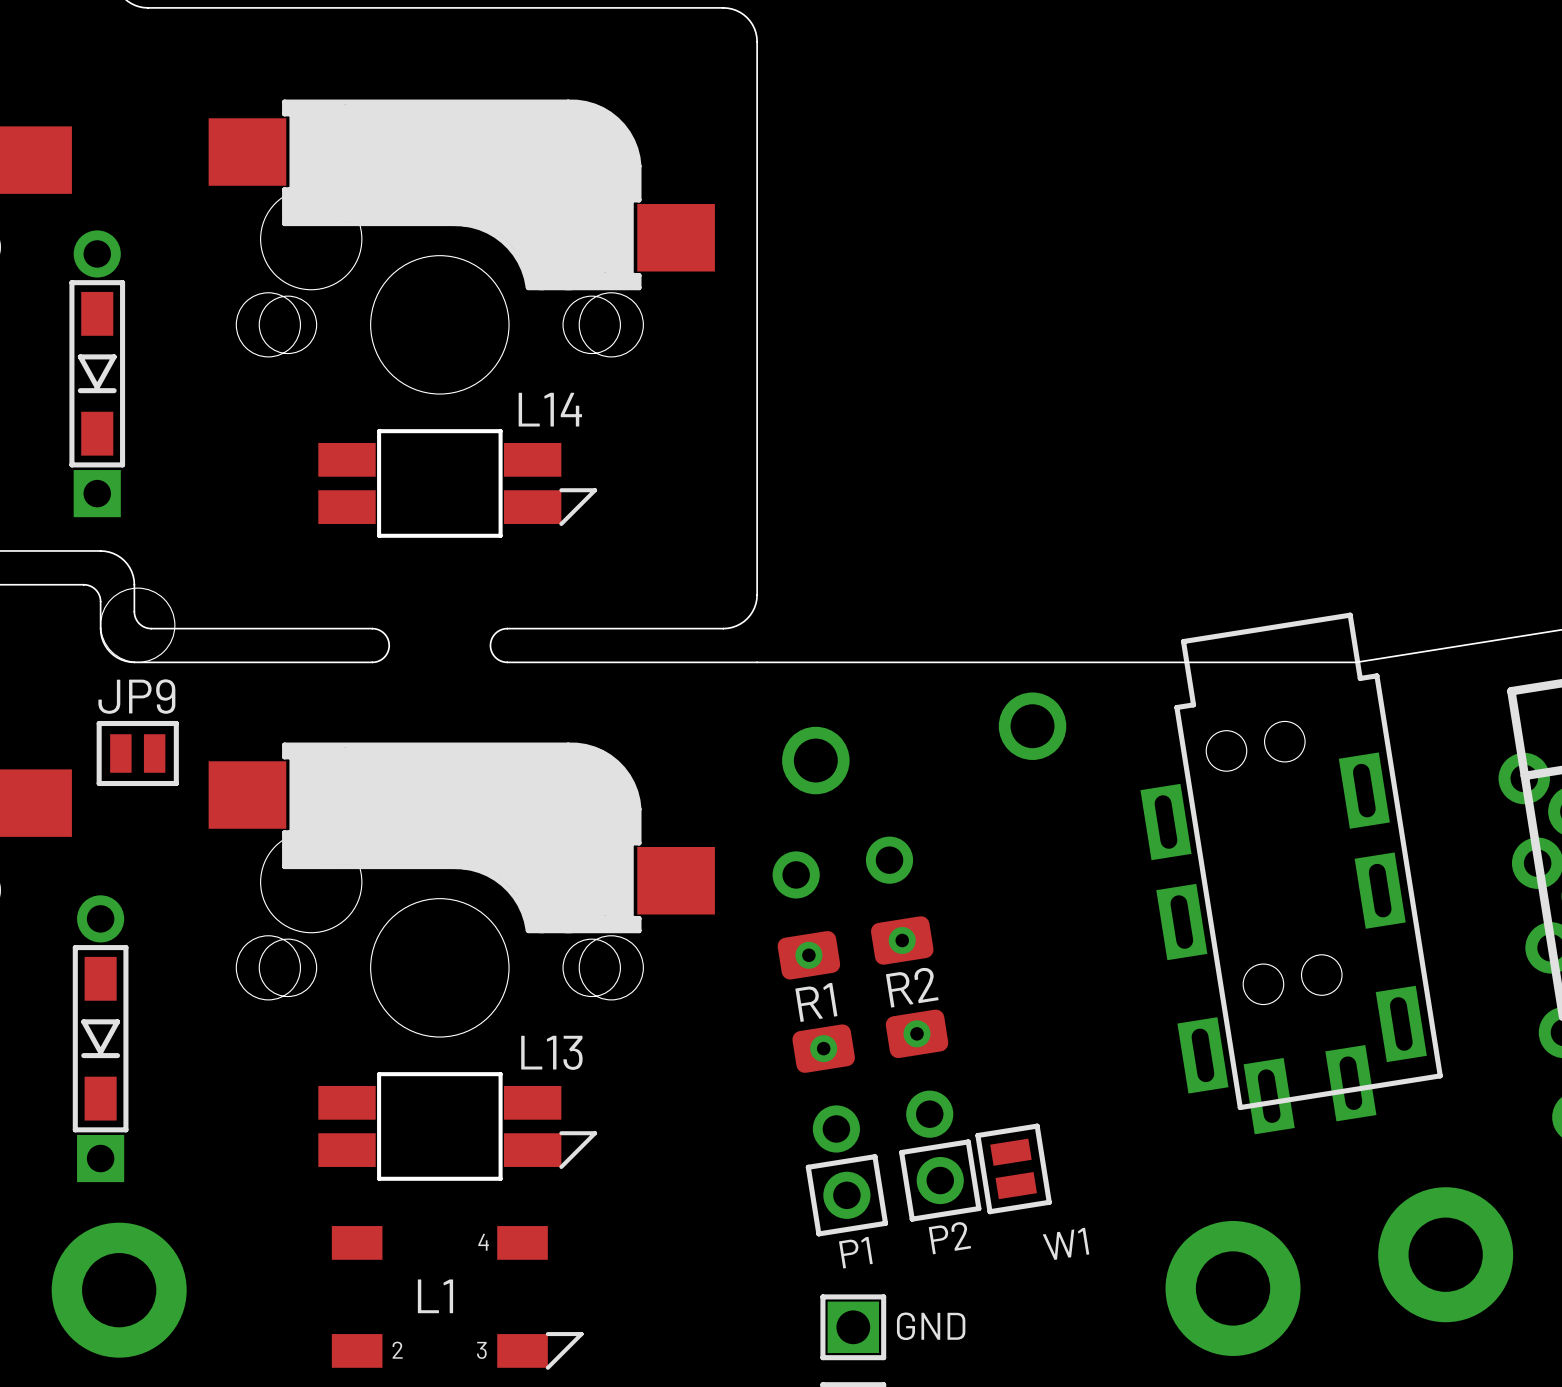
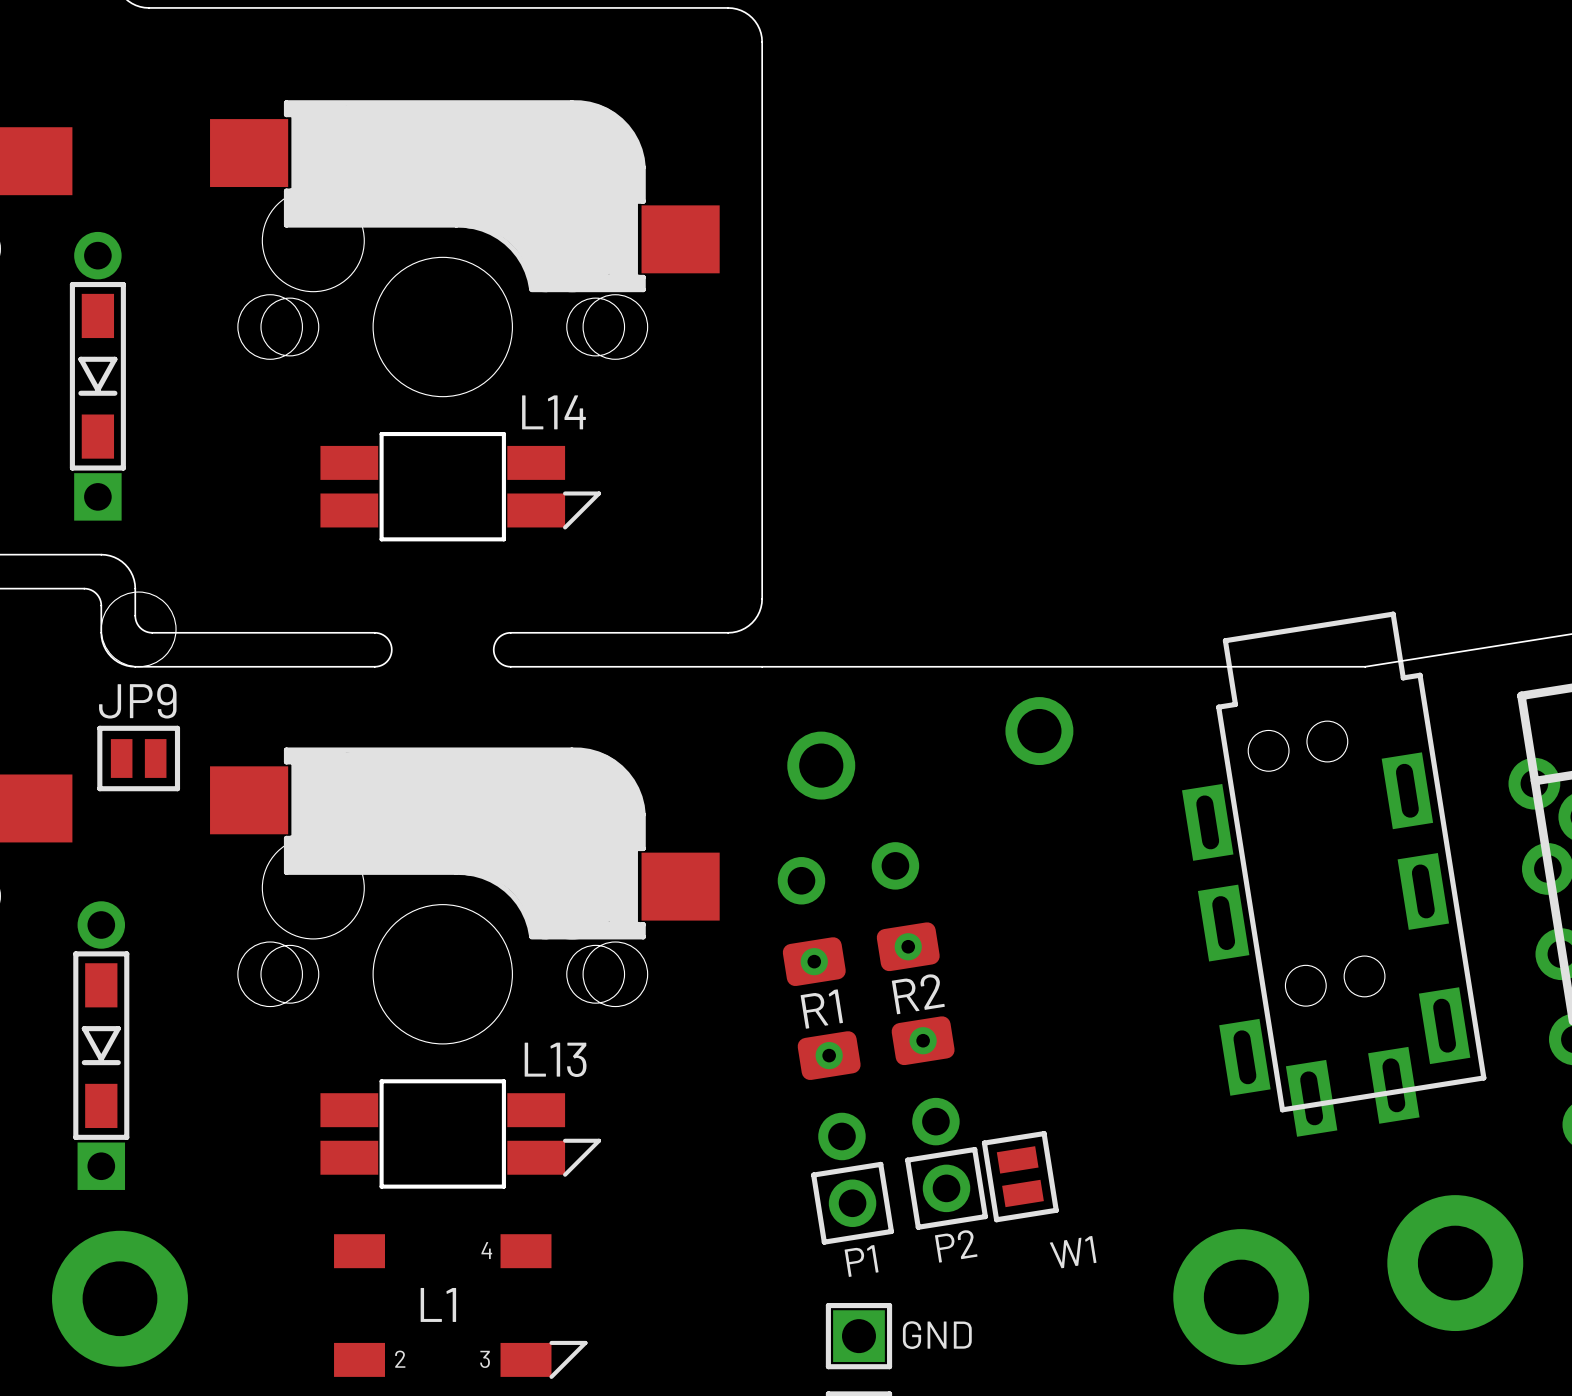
part position: (1291, 873) -> (1334, 874)

